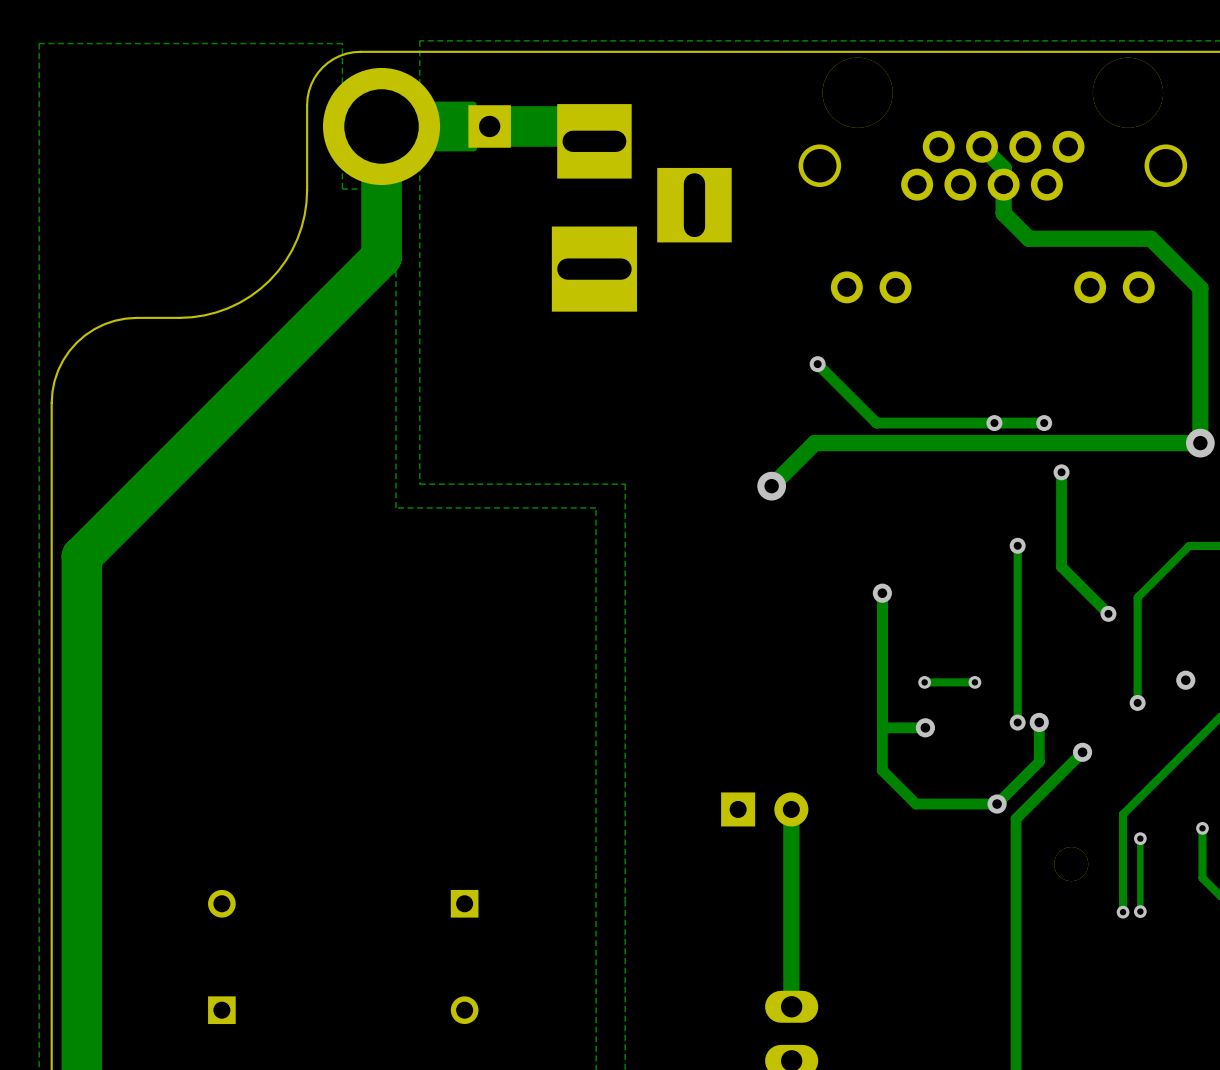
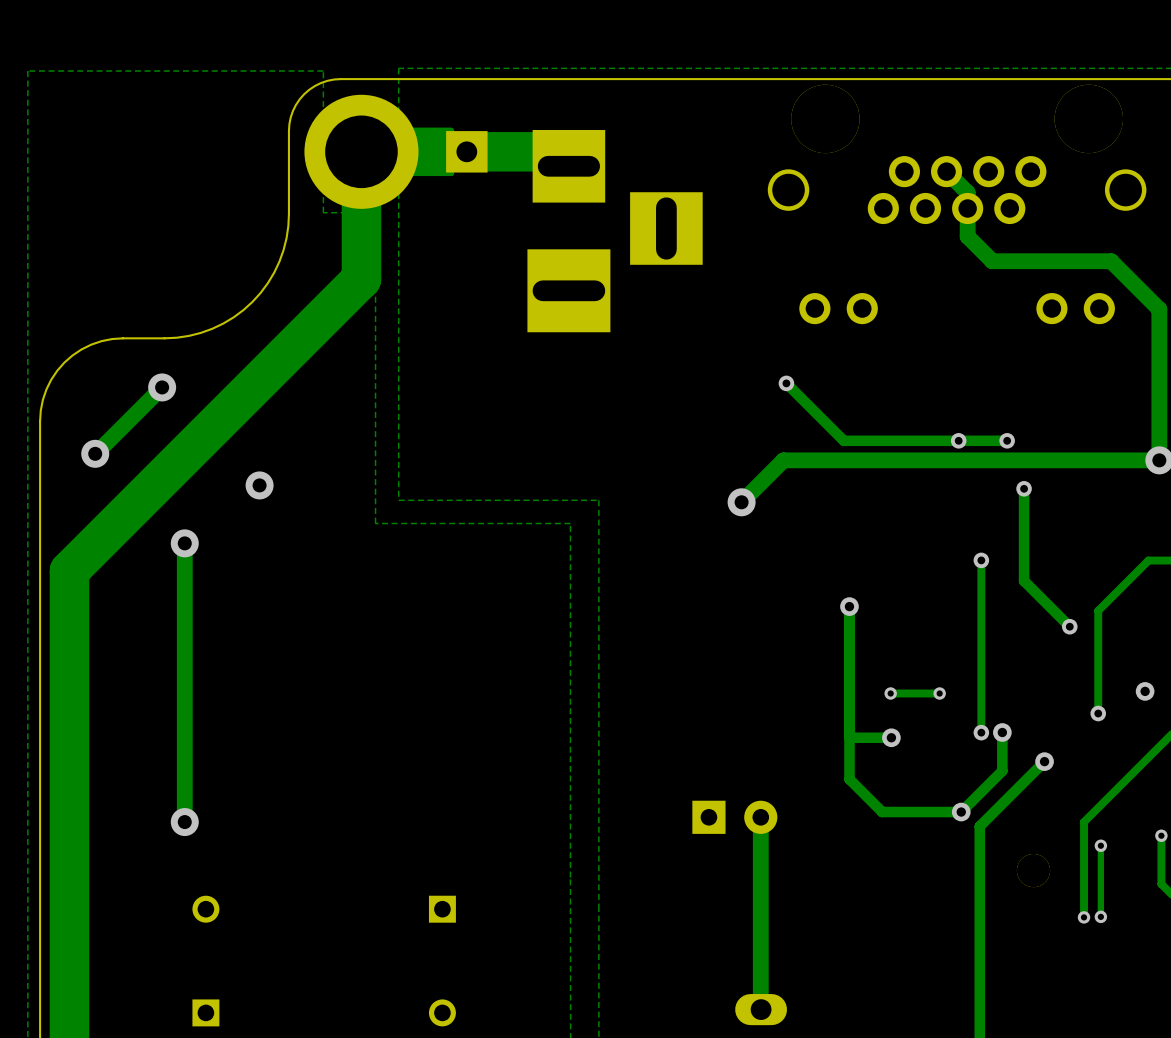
via: none -> (162, 387)
track: none -> (95, 453) (162, 387) (95, 453)
via: none -> (95, 453)
via: none -> (259, 485)
track: none -> (184, 543) (184, 822) (184, 543)
via: none -> (184, 543)
via: none -> (184, 822)

